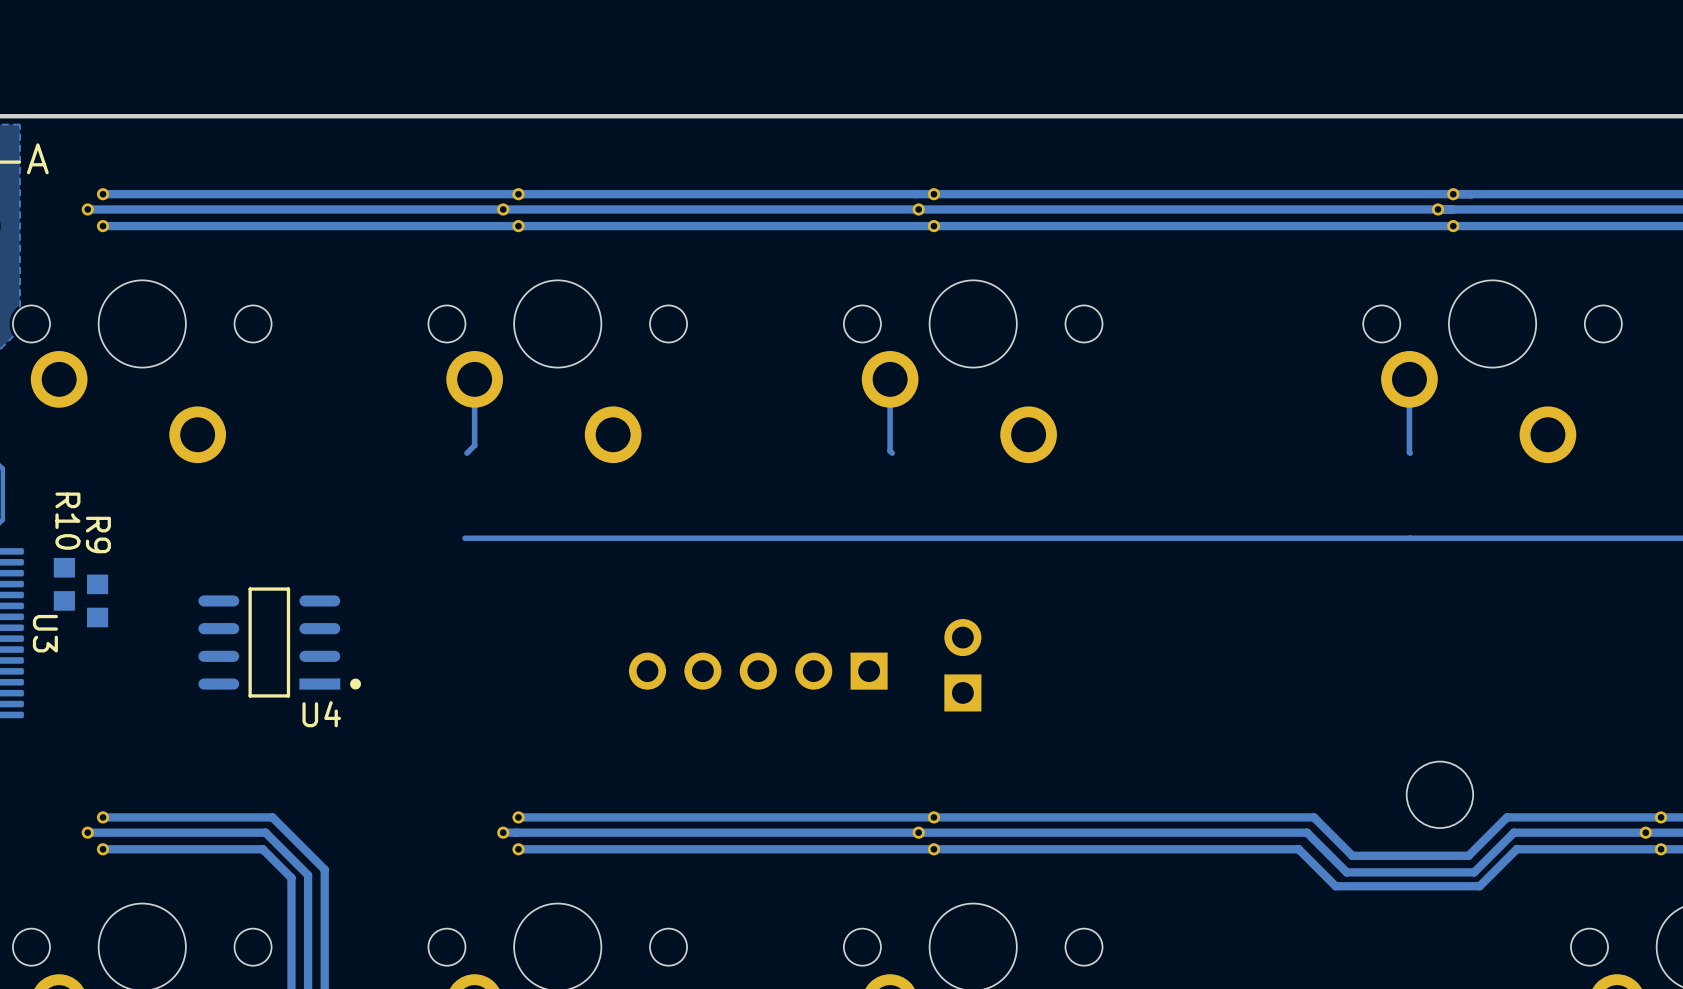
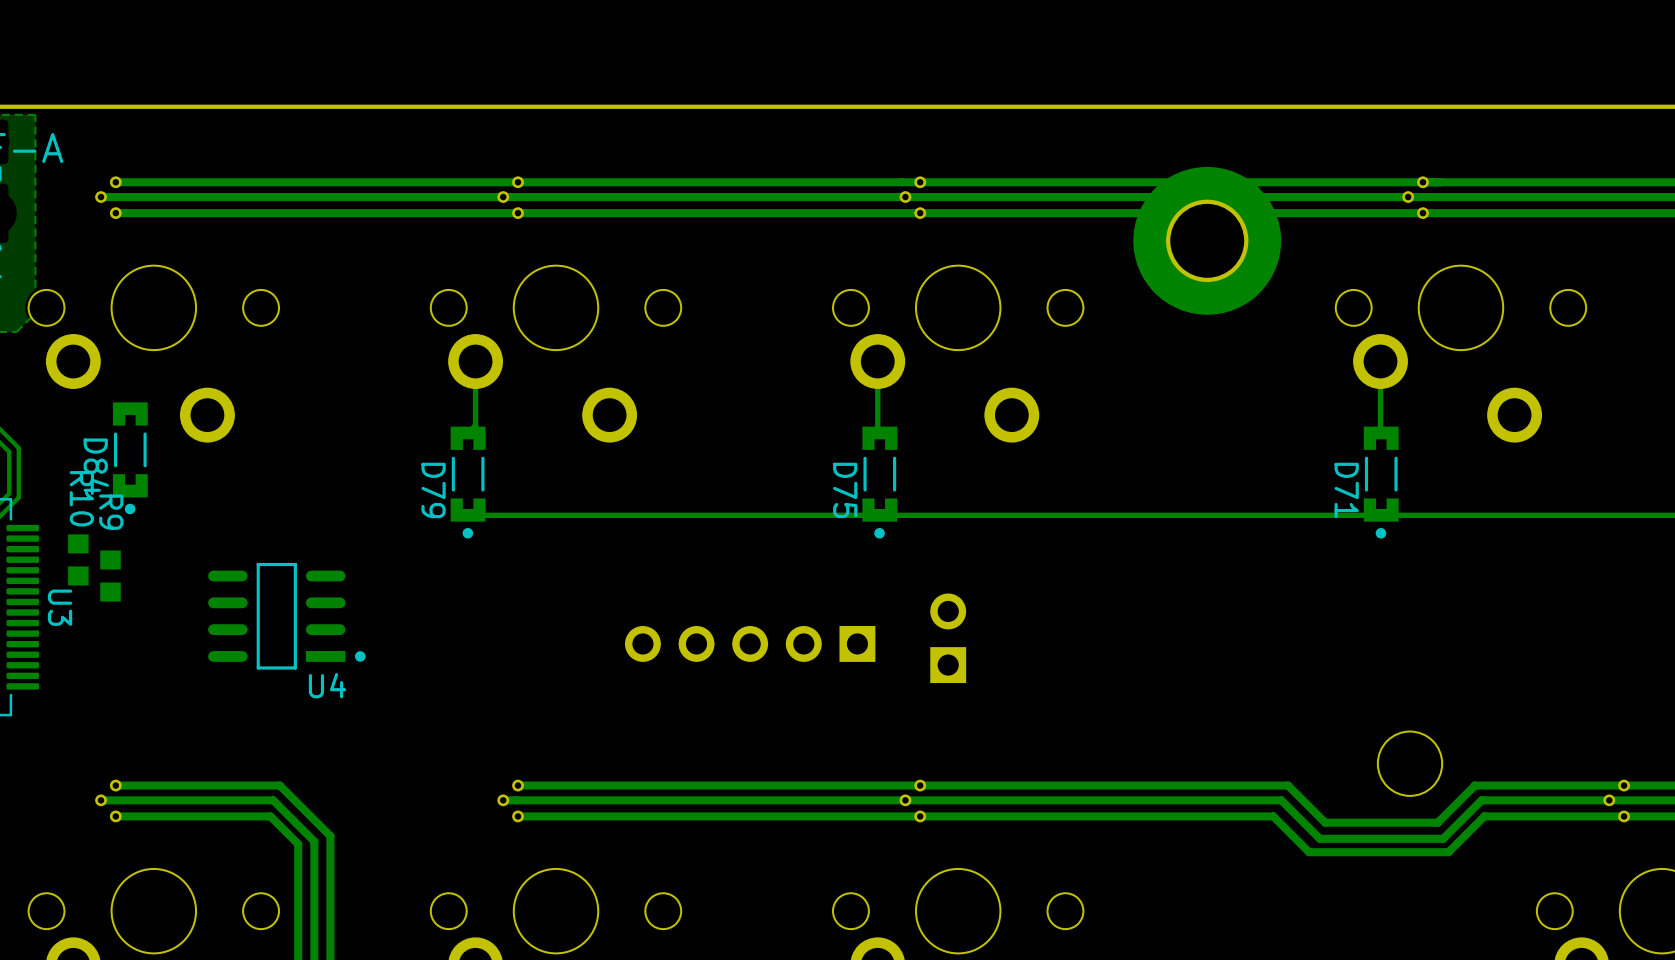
part: none -> (1207, 240)
D84: none -> (130, 458)
D79: none -> (468, 482)
D75: none -> (879, 482)
D71: none -> (1381, 482)

